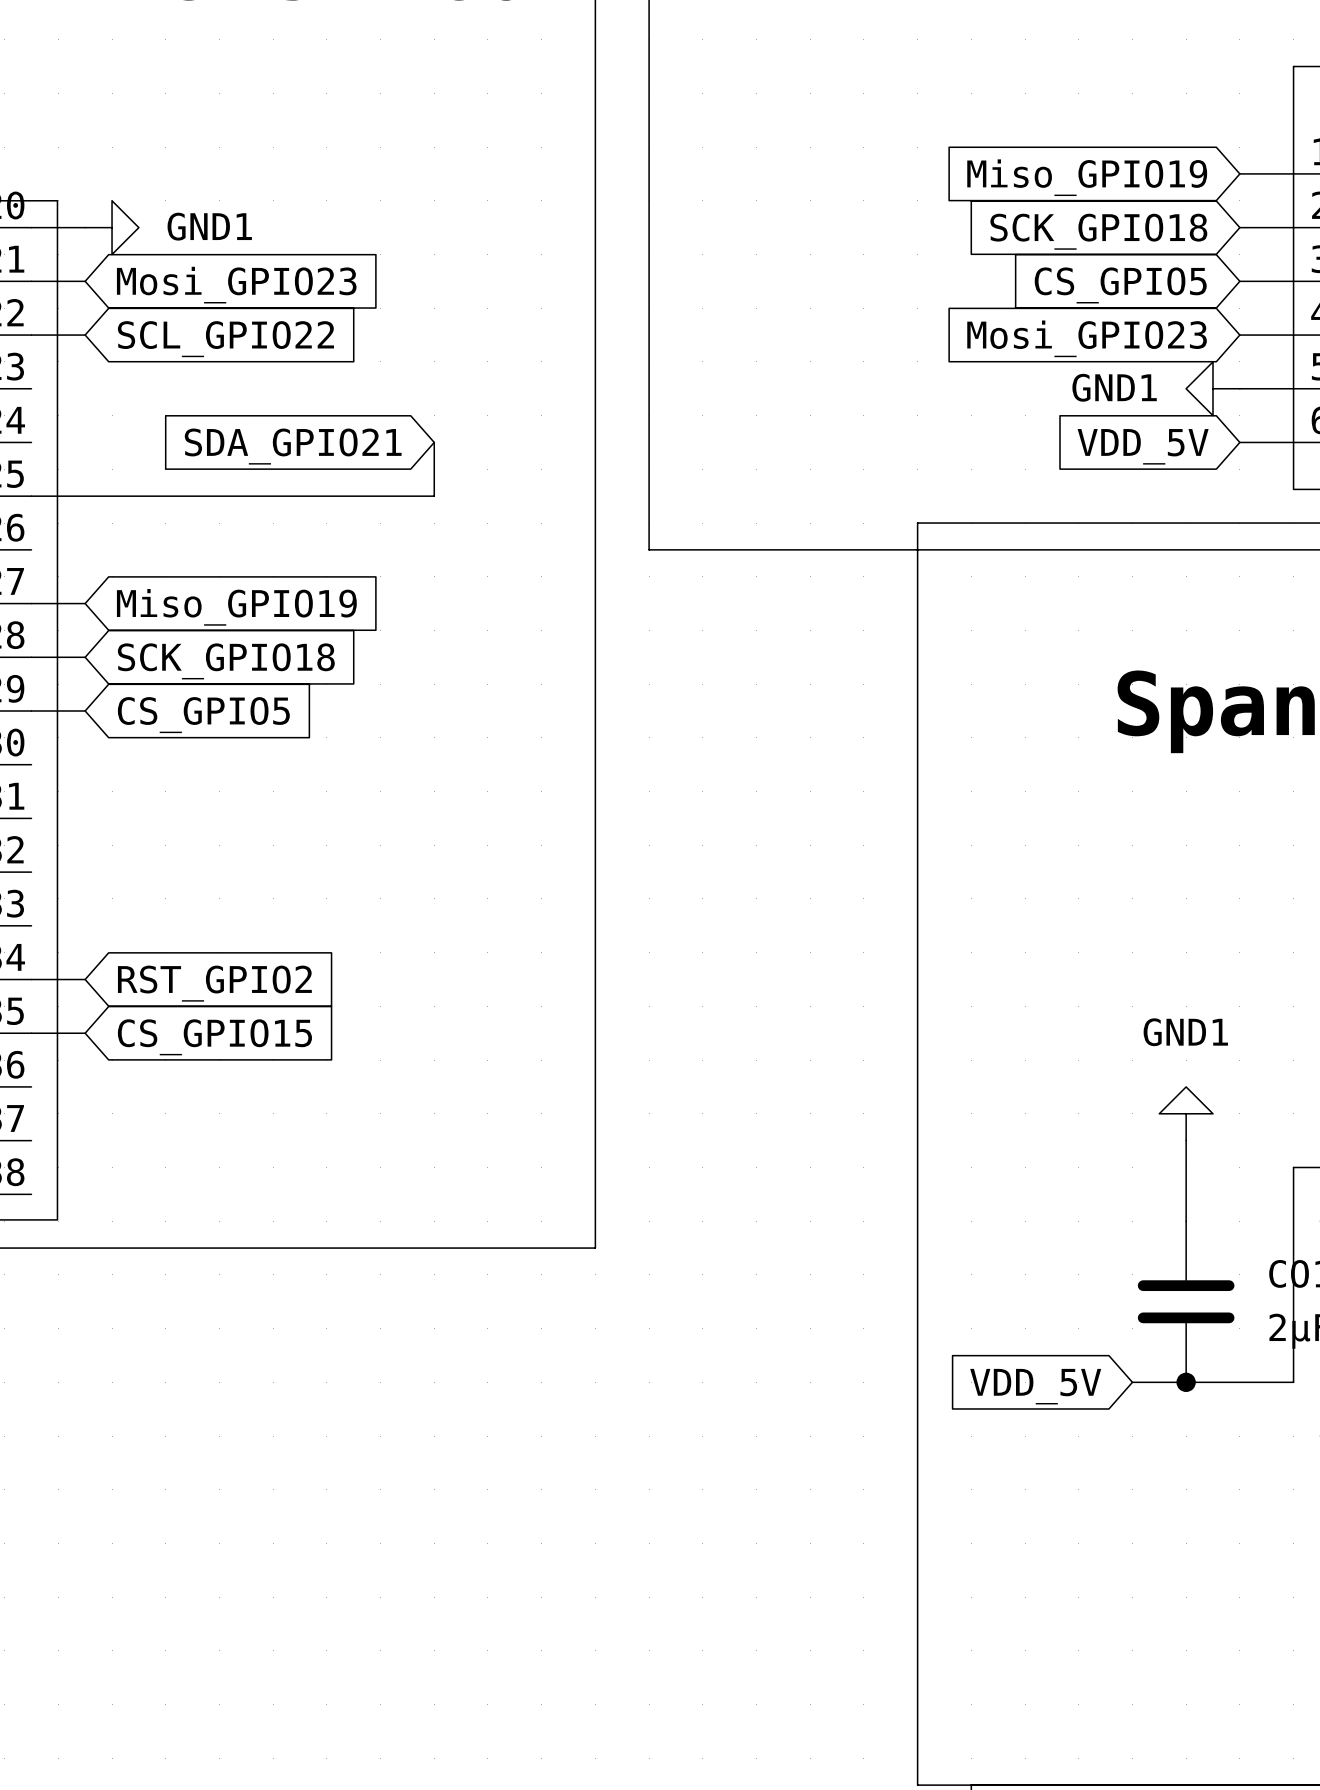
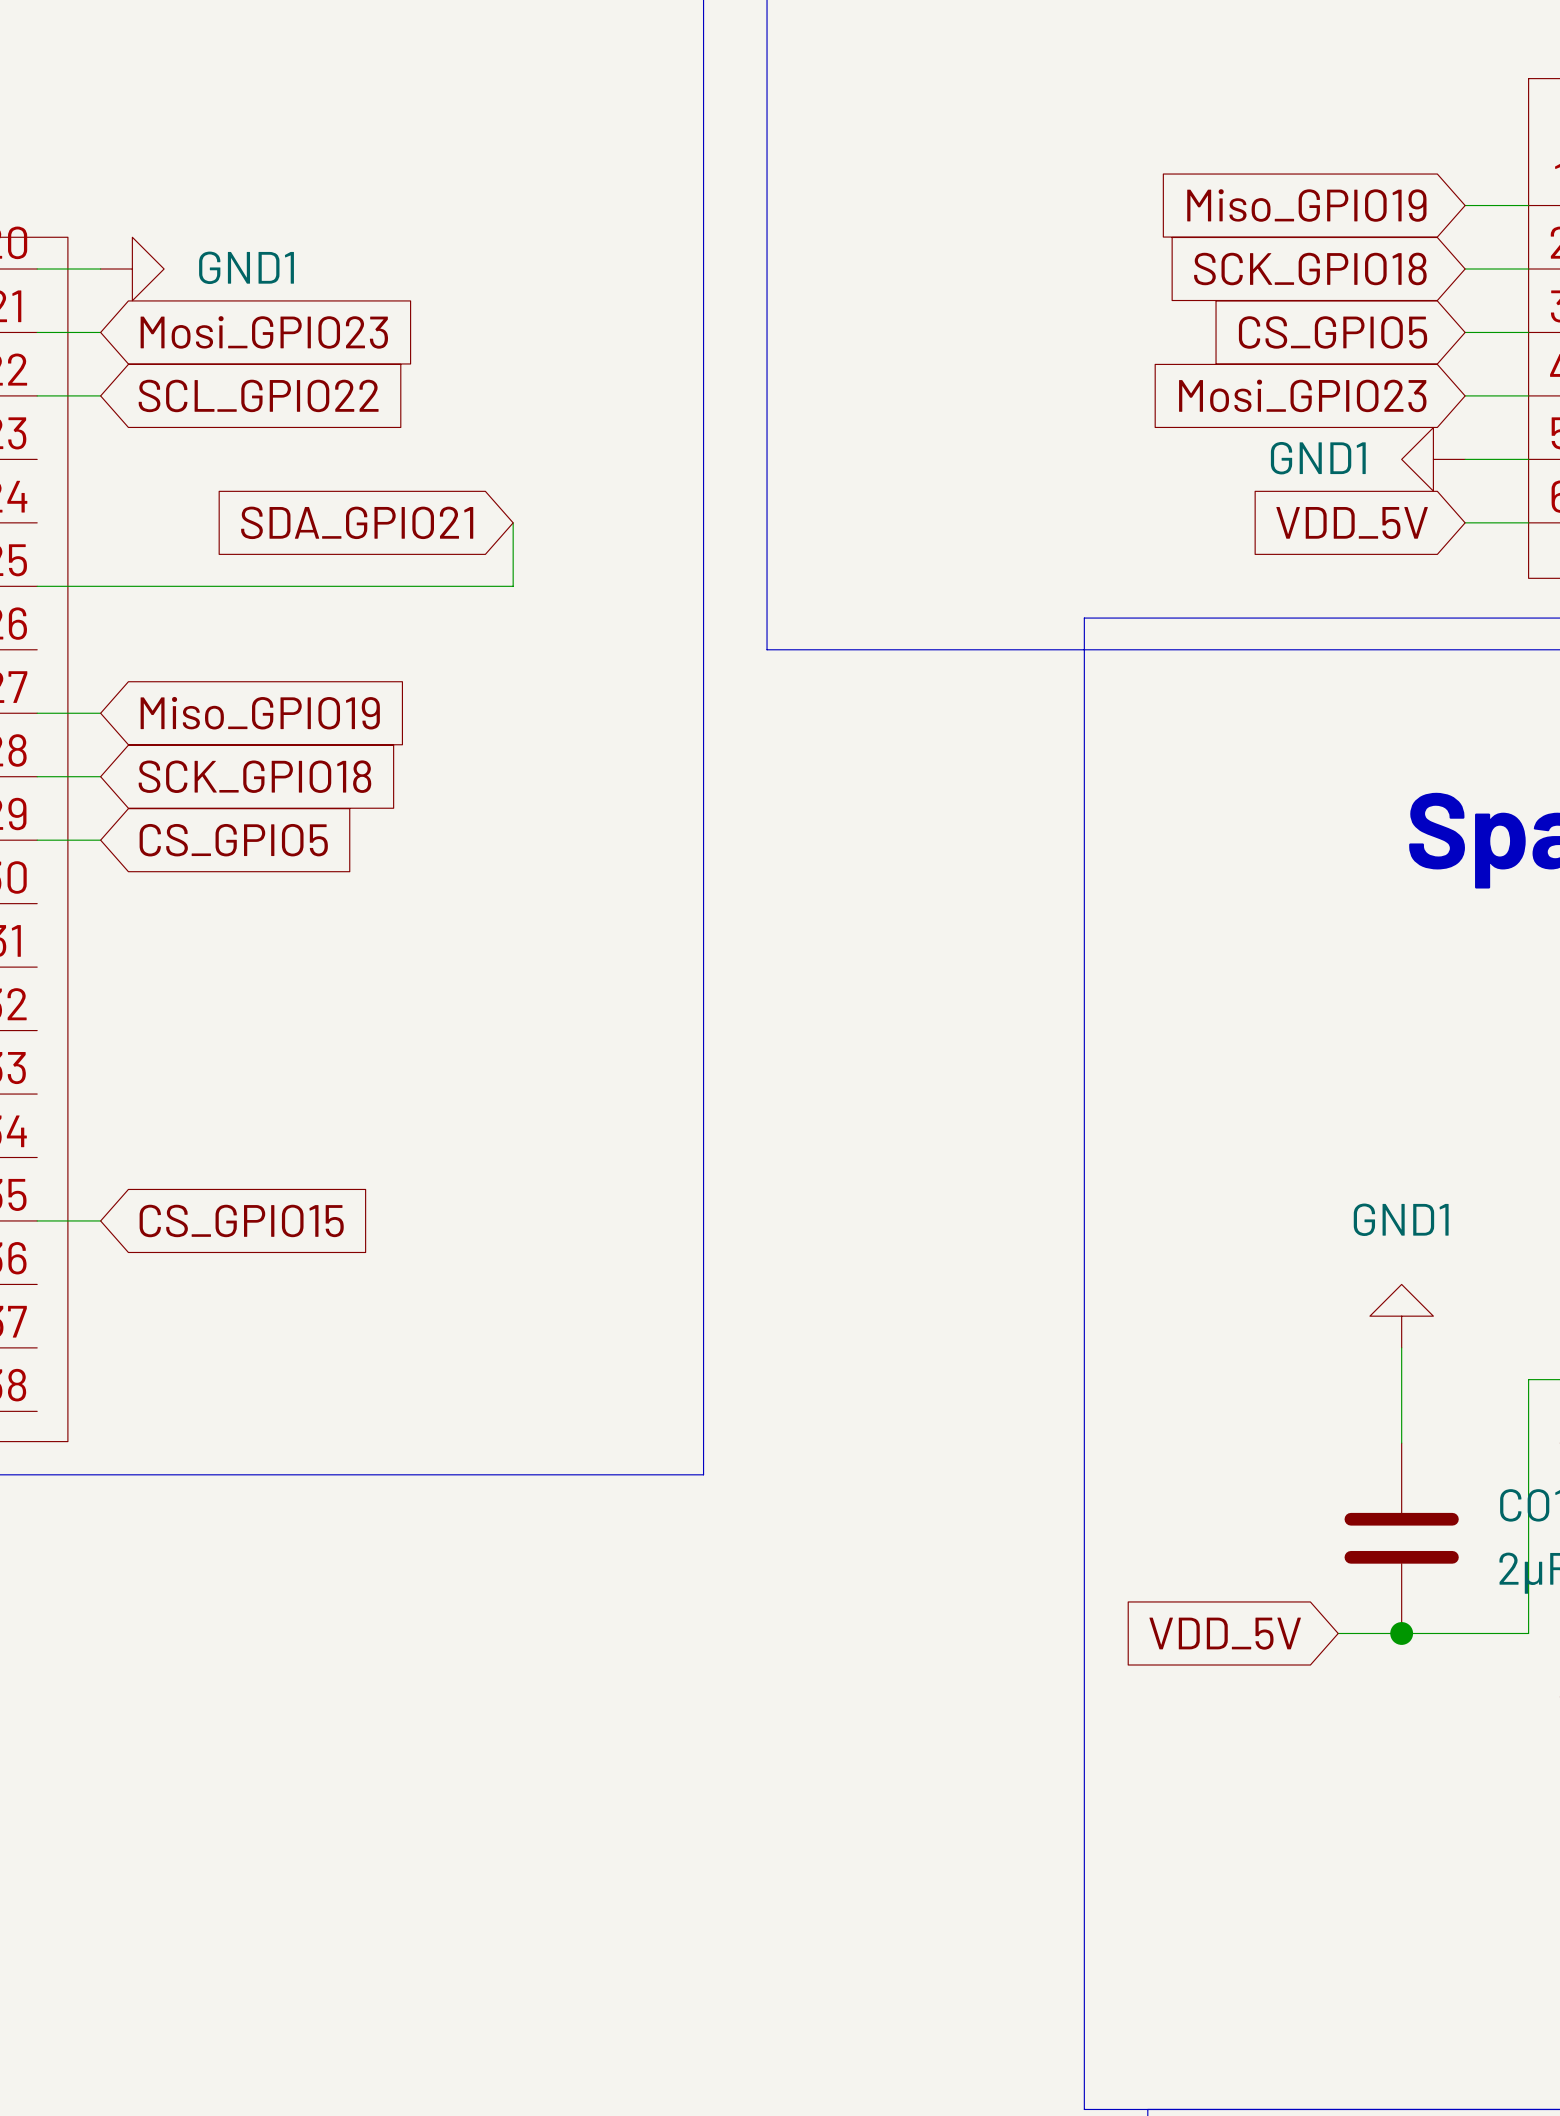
wire: (31, 979) (85, 979) -> none
global label: RST_GPIO2 (214, 983) -> none

